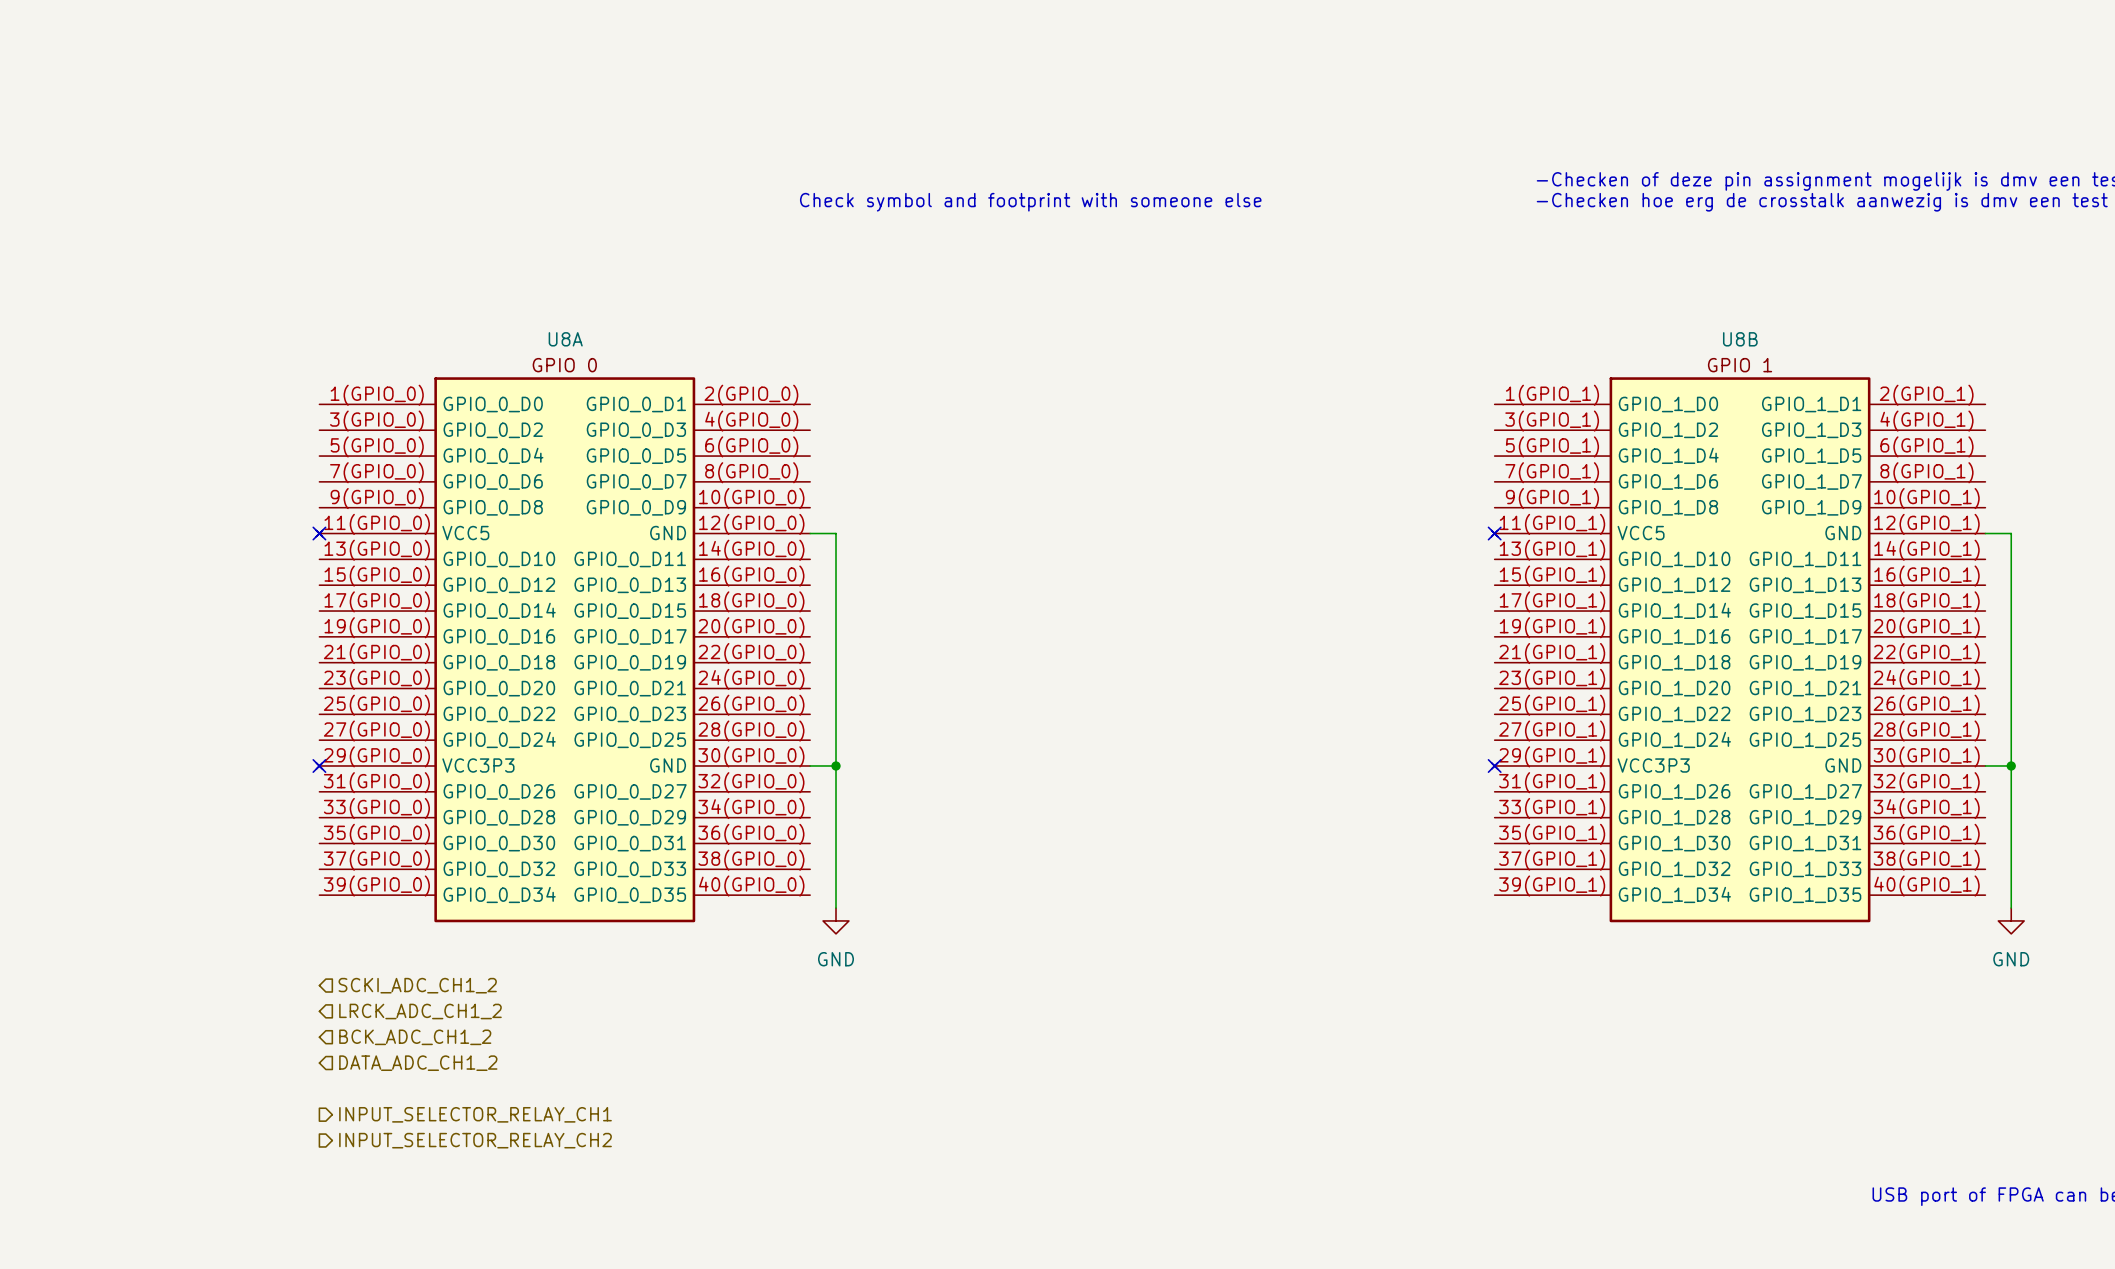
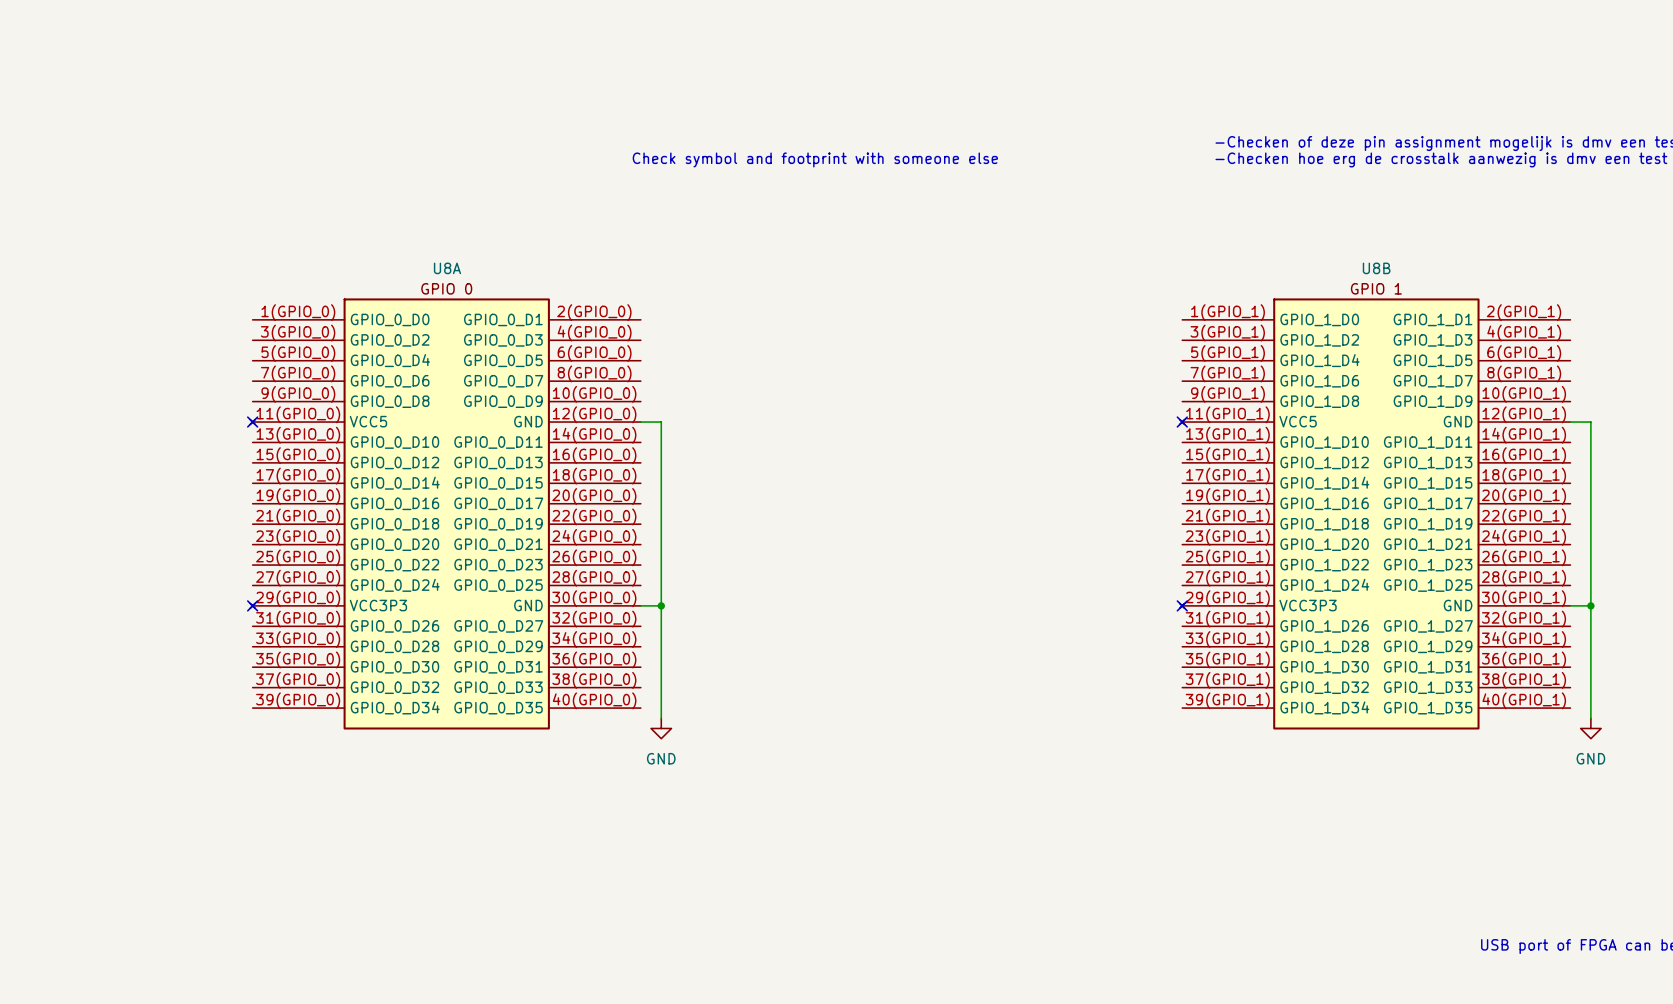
hierarchical label: SCKI_ADC_CH1_2 (417, 985) -> none
hierarchical label: LRCK_ADC_CH1_2 (420, 1011) -> none
hierarchical label: BCK_ADC_CH1_2 (415, 1037) -> none
hierarchical label: DATA_ADC_CH1_2 (418, 1063) -> none
hierarchical label: INPUT_SELECTOR_RELAY_CH1 (475, 1114) -> none
hierarchical label: INPUT_SELECTOR_RELAY_CH2 (475, 1140) -> none

